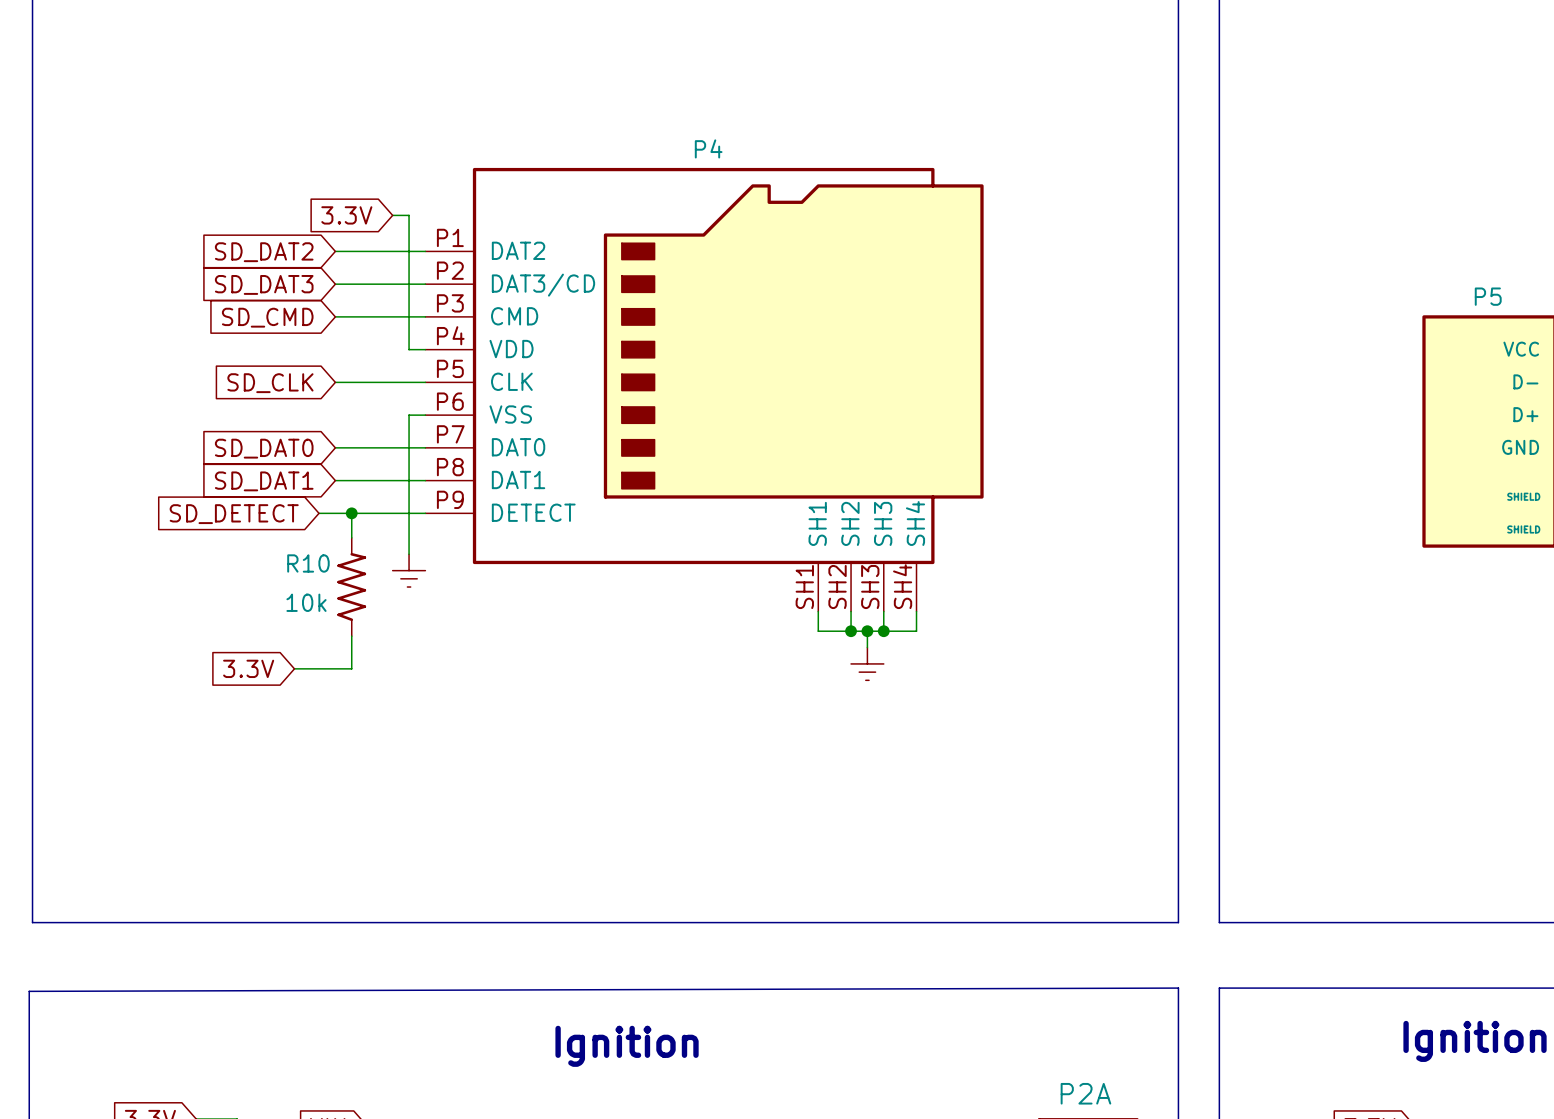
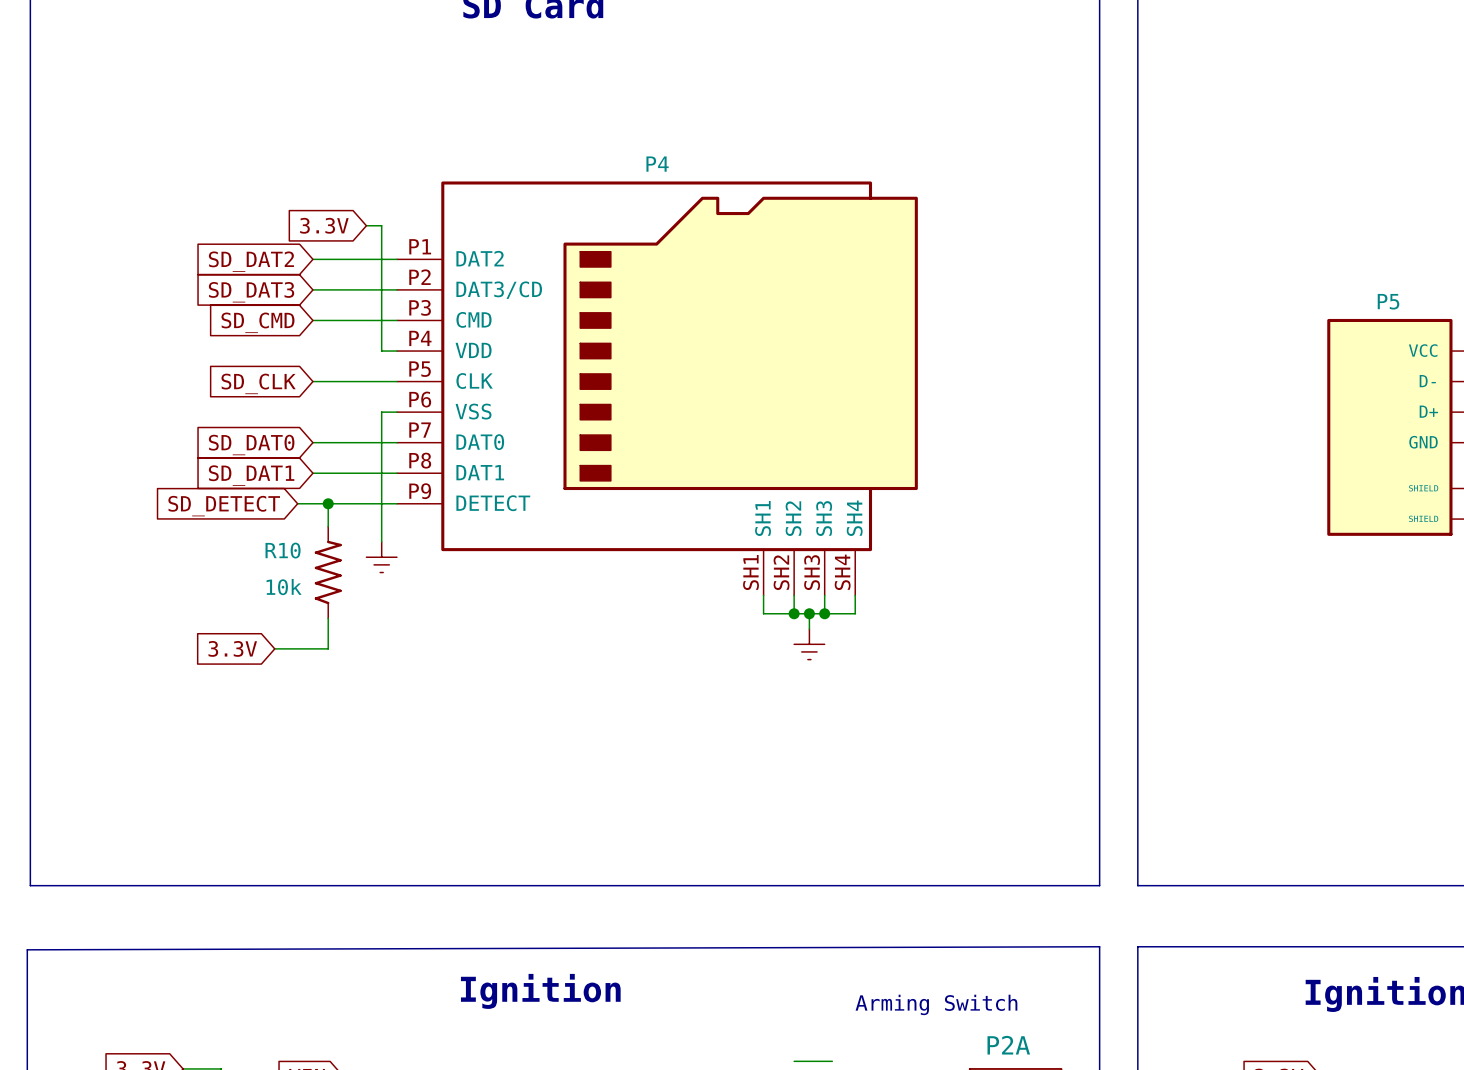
text position: Ignition (627, 1046) -> Ignition (540, 991)
text: none -> Arming Switch (936, 1004)
wire: none -> (794, 1061) (832, 1061)

